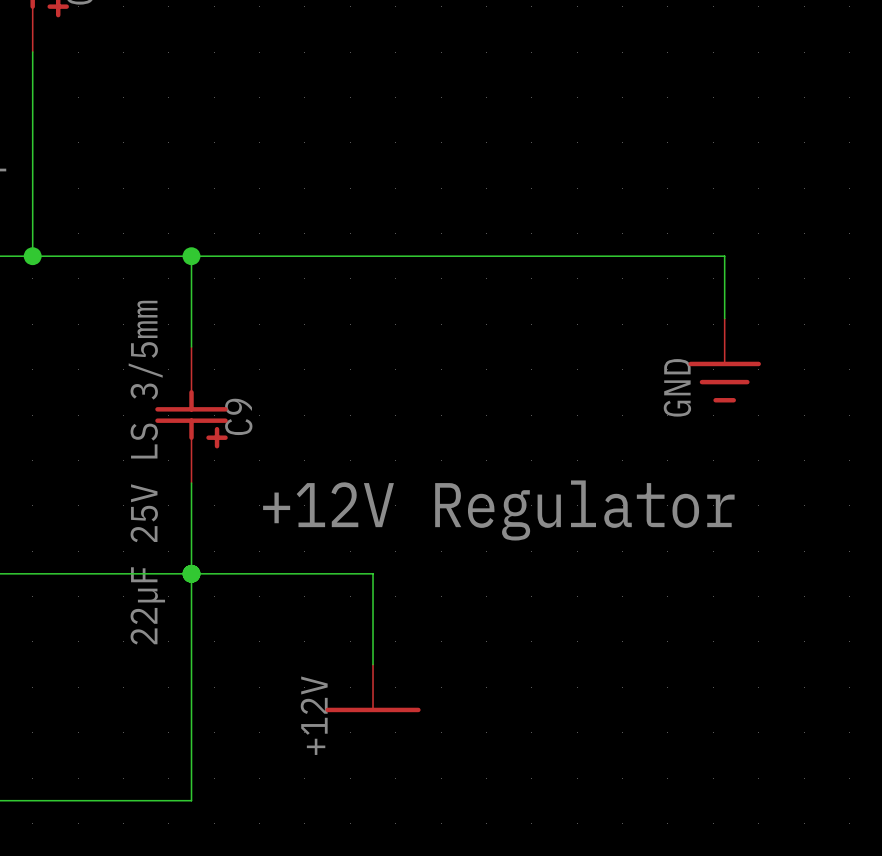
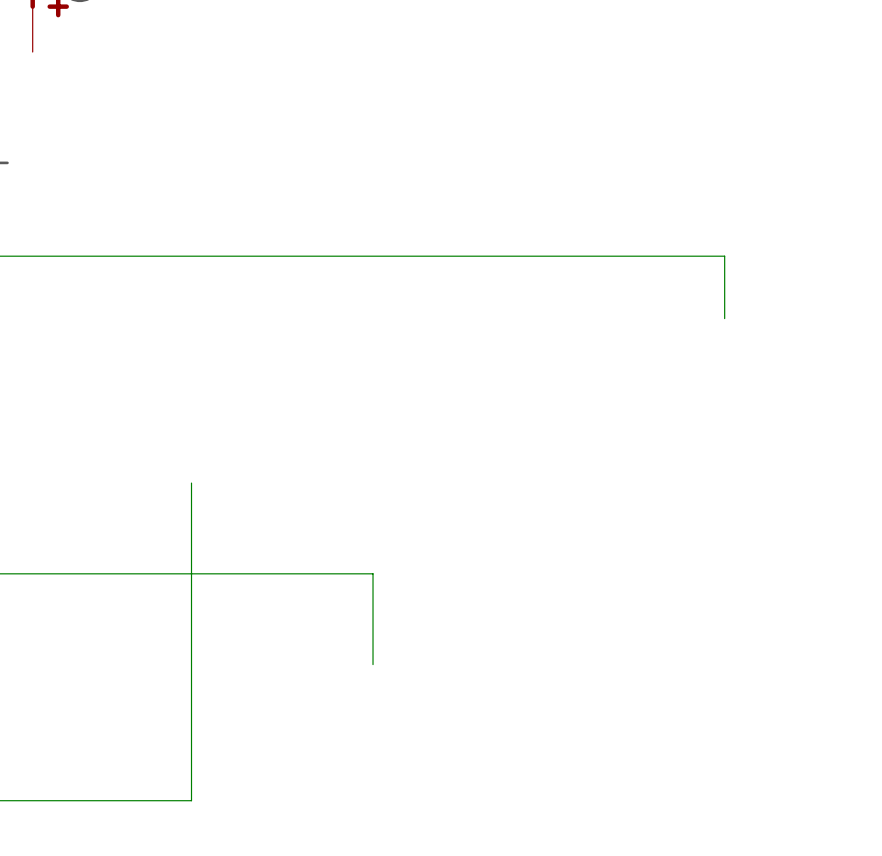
wire: (32, 52) (32, 256) -> none
junction: (32, 256) -> none
wire: (191, 256) (191, 346) -> none
junction: (191, 256) -> none
power symbol: (724, 360) -> none
text: GND (677, 387) -> none
part: (191, 415) -> none
text: C9 (238, 416) -> none
text: 22µF 25V LS 3/5mm (146, 472) -> none
text: +12V Regulator (498, 510) -> none
junction: (191, 573) -> none
power symbol: (373, 688) -> none
text: +12V (314, 715) -> none

